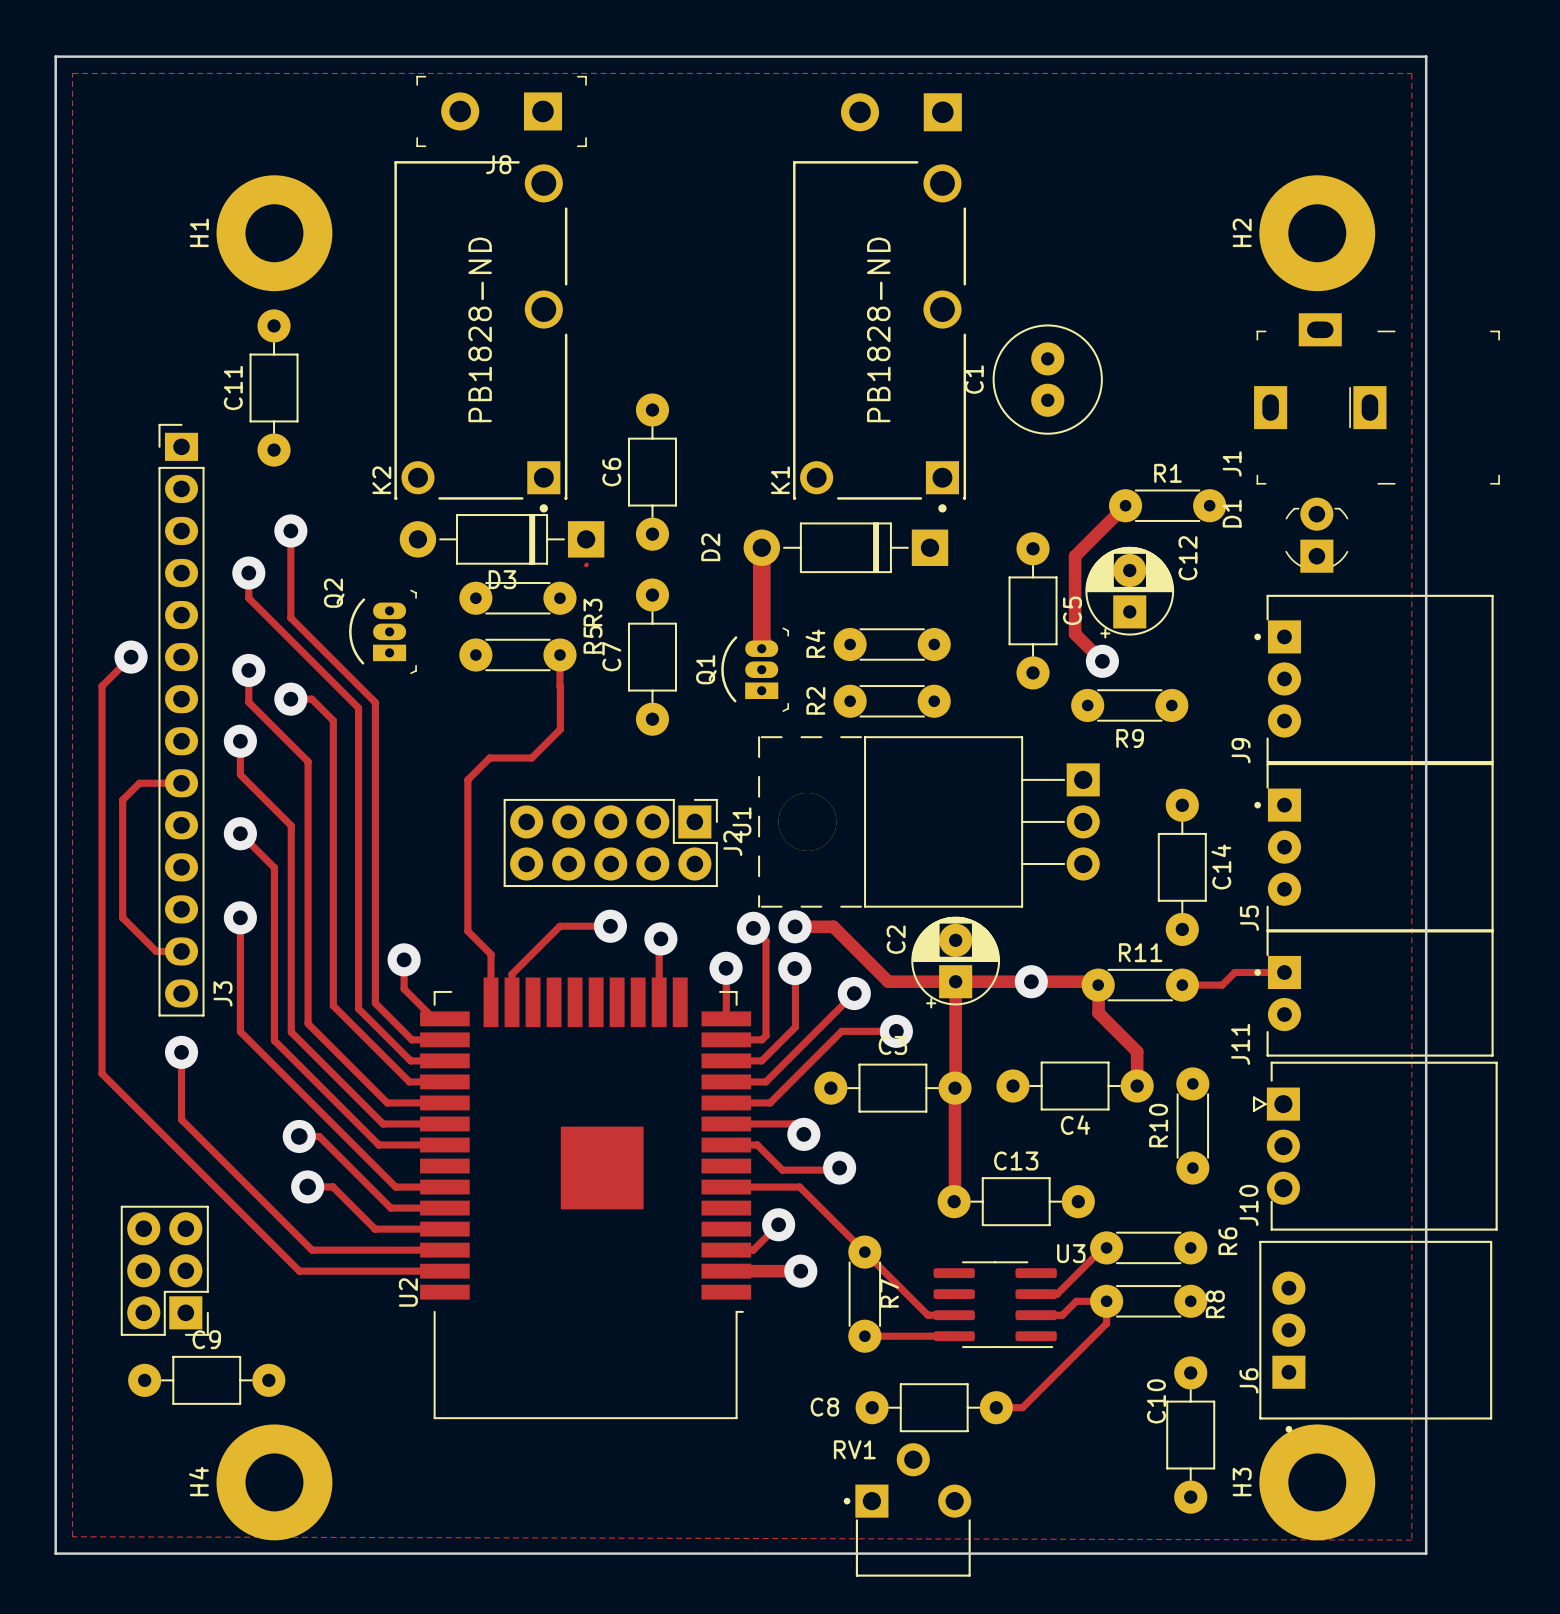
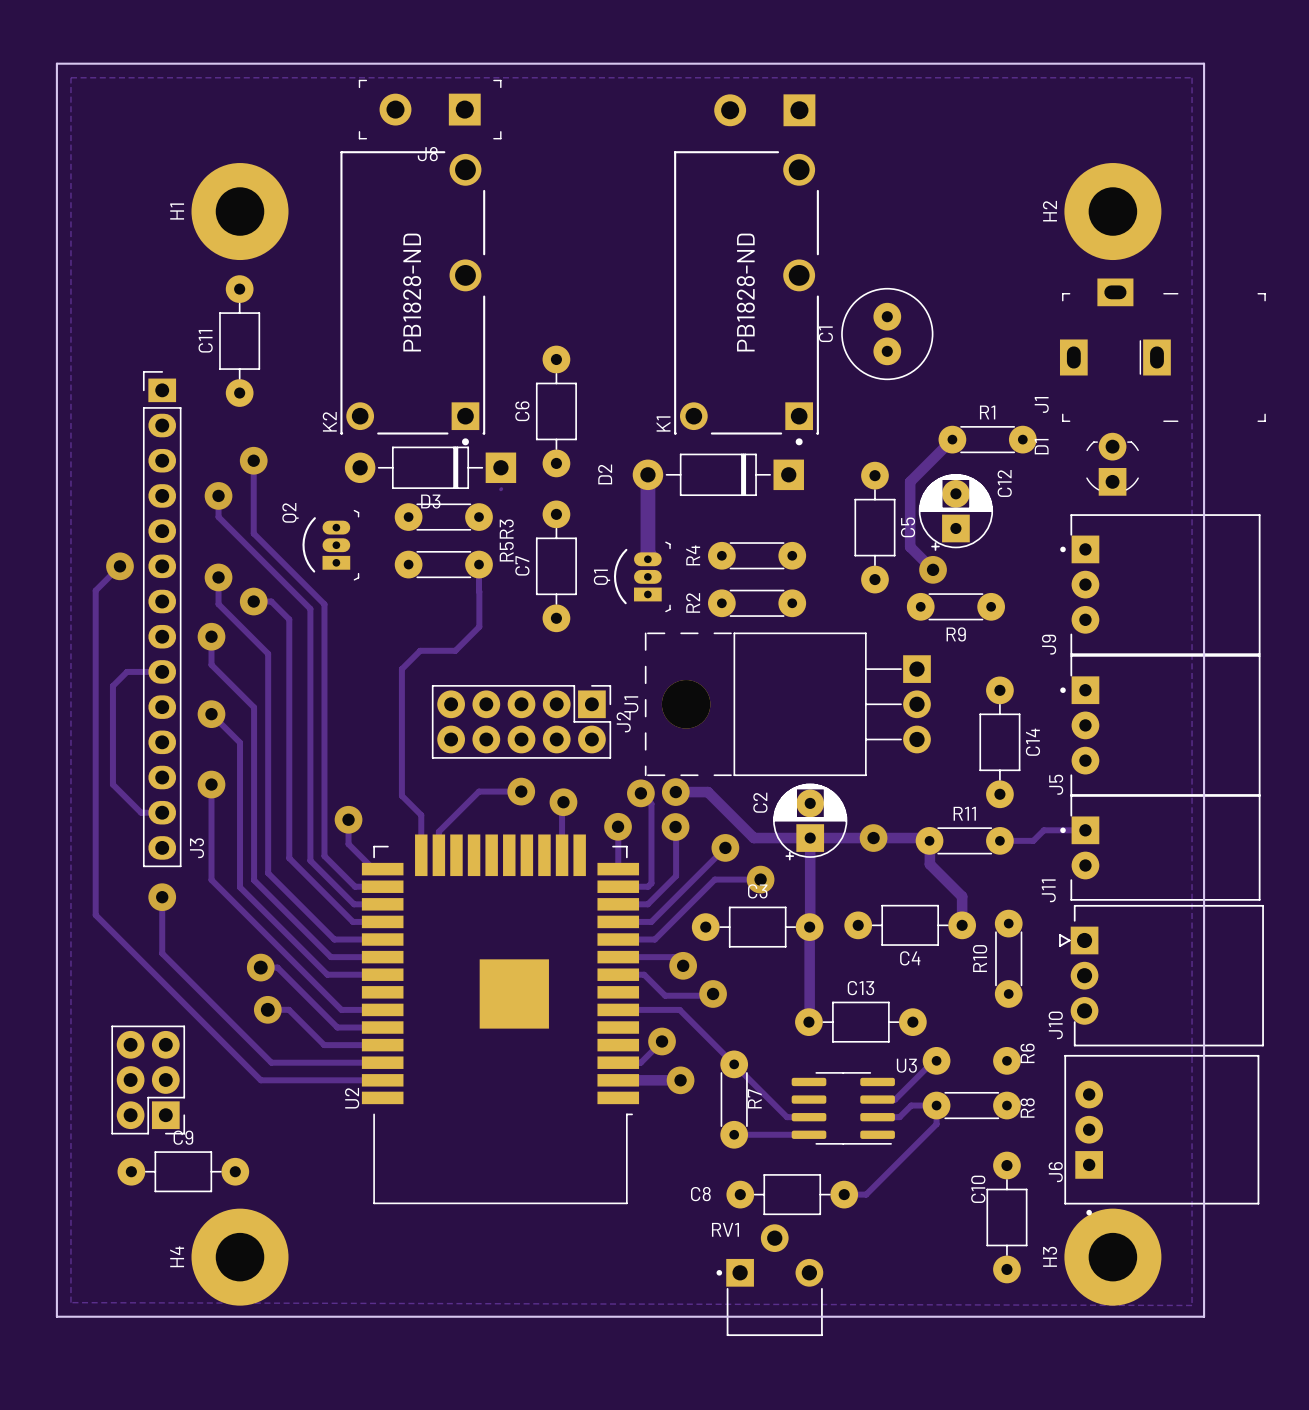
R6 side: top (1148, 1247) -> bottom (971, 1060)

